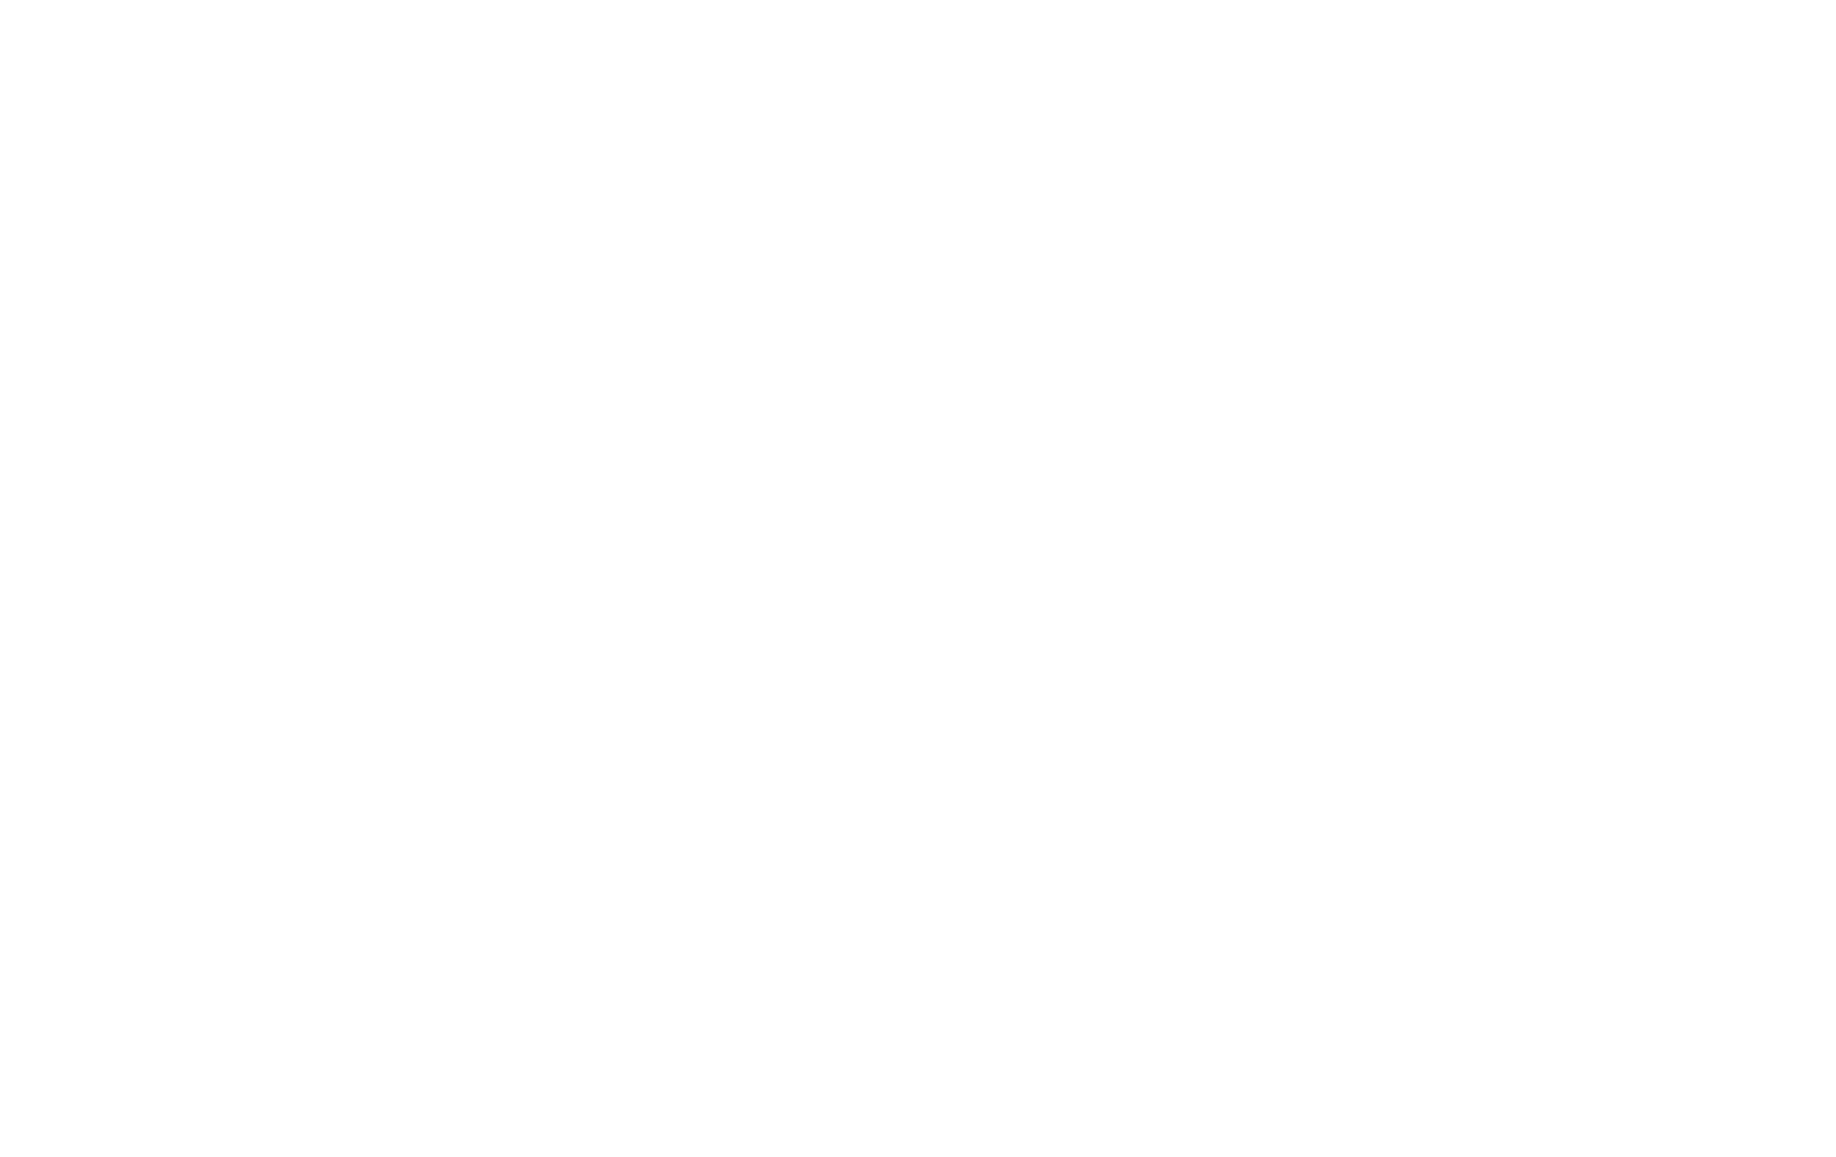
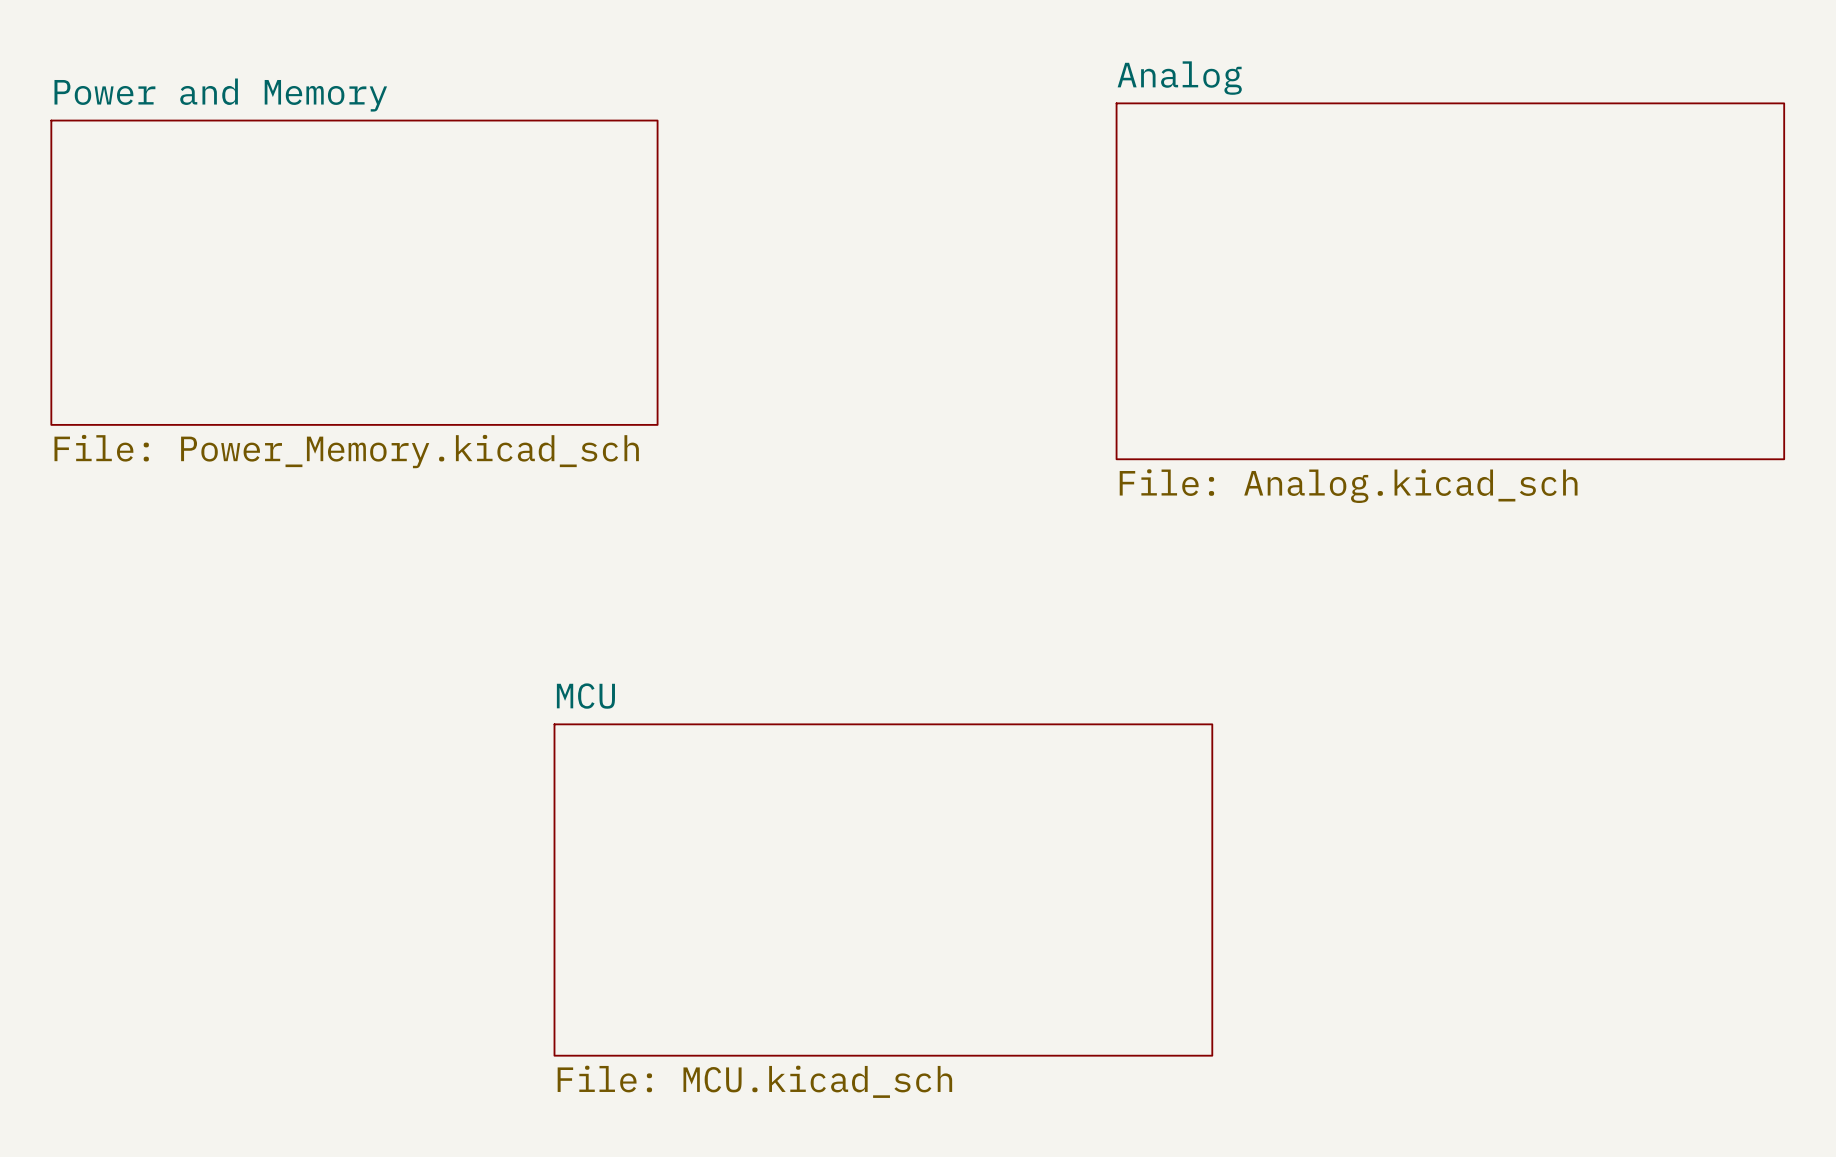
sheet Power and Memory: none -> File: Power_Memory.kicad_sch (354, 272)
sheet Analog: none -> File: Analog.kicad_sch (1450, 281)
sheet MCU: none -> File: MCU.kicad_sch (883, 890)

